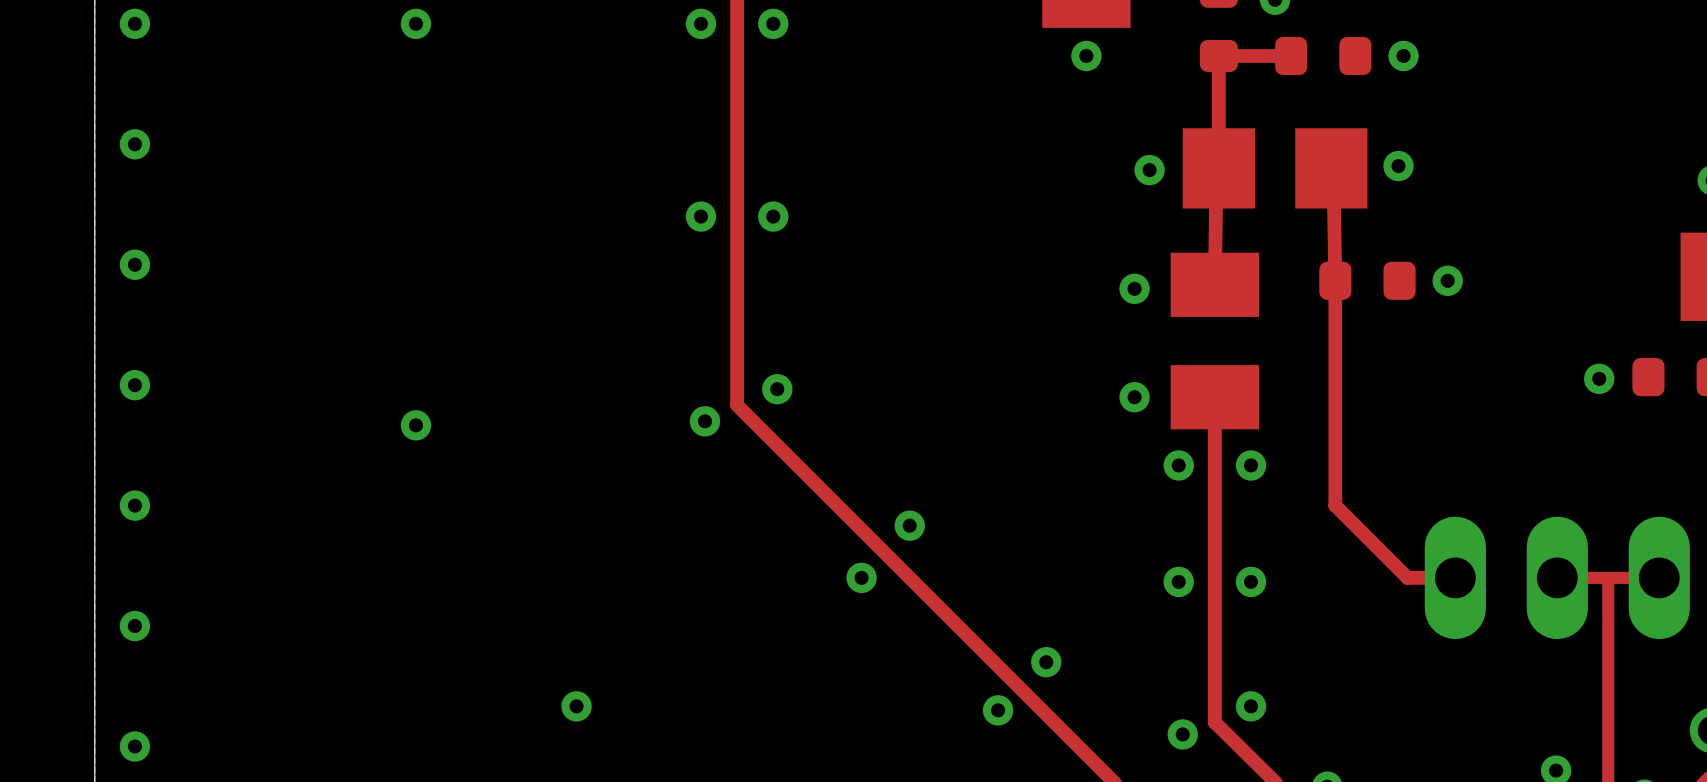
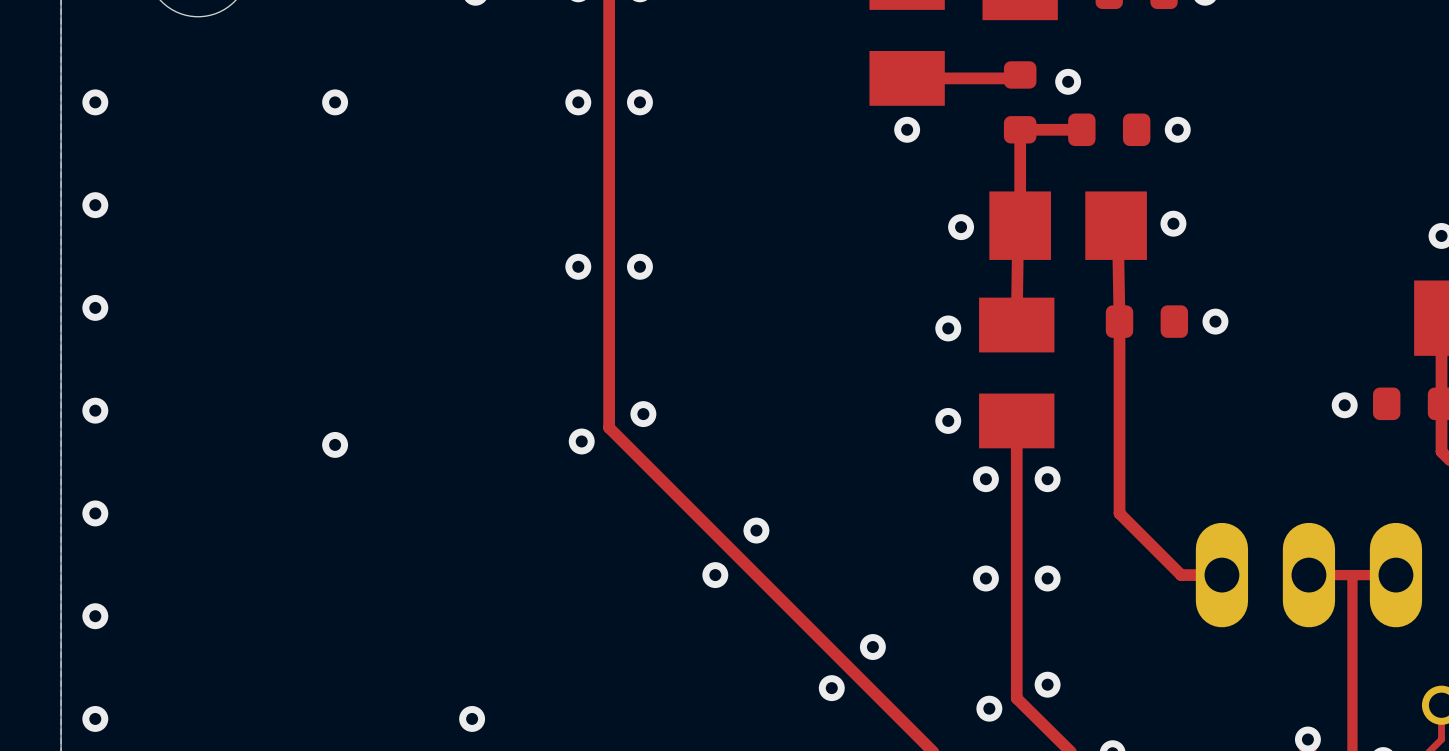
via position: (576, 706) -> (472, 718)

